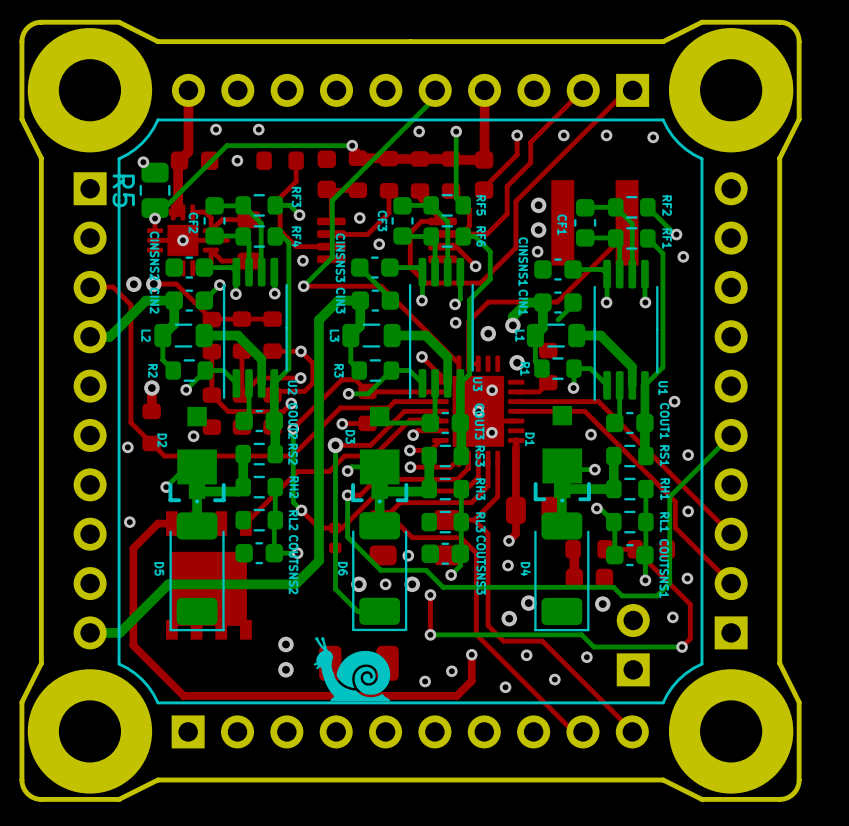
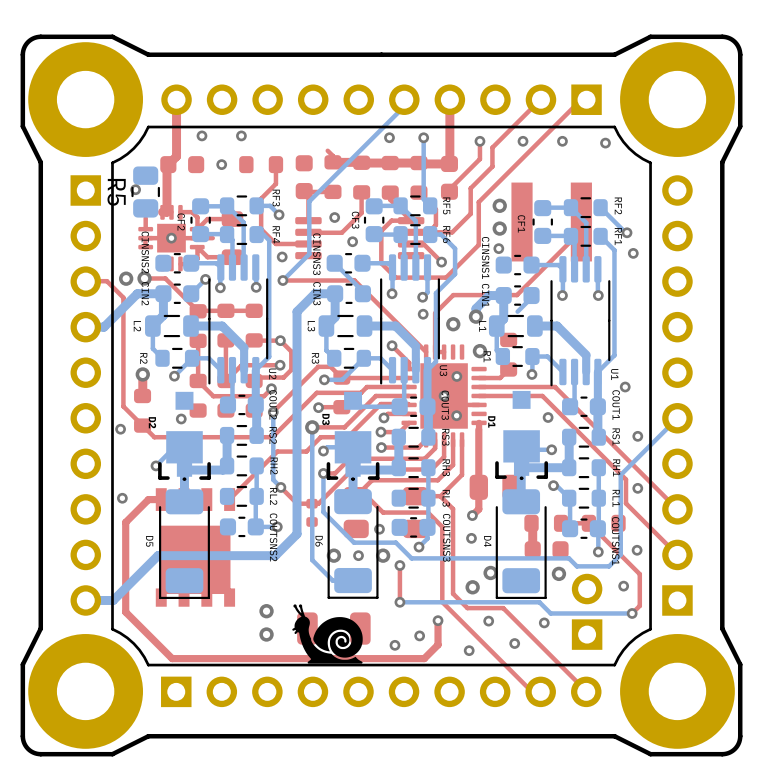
bottom track: (352, 145) (226, 145) (164, 208) (155, 208) (155, 218) -> none
via: (352, 145) -> none
via: (143, 162) -> none
via: none -> (135, 189)
via: (155, 218) -> none

